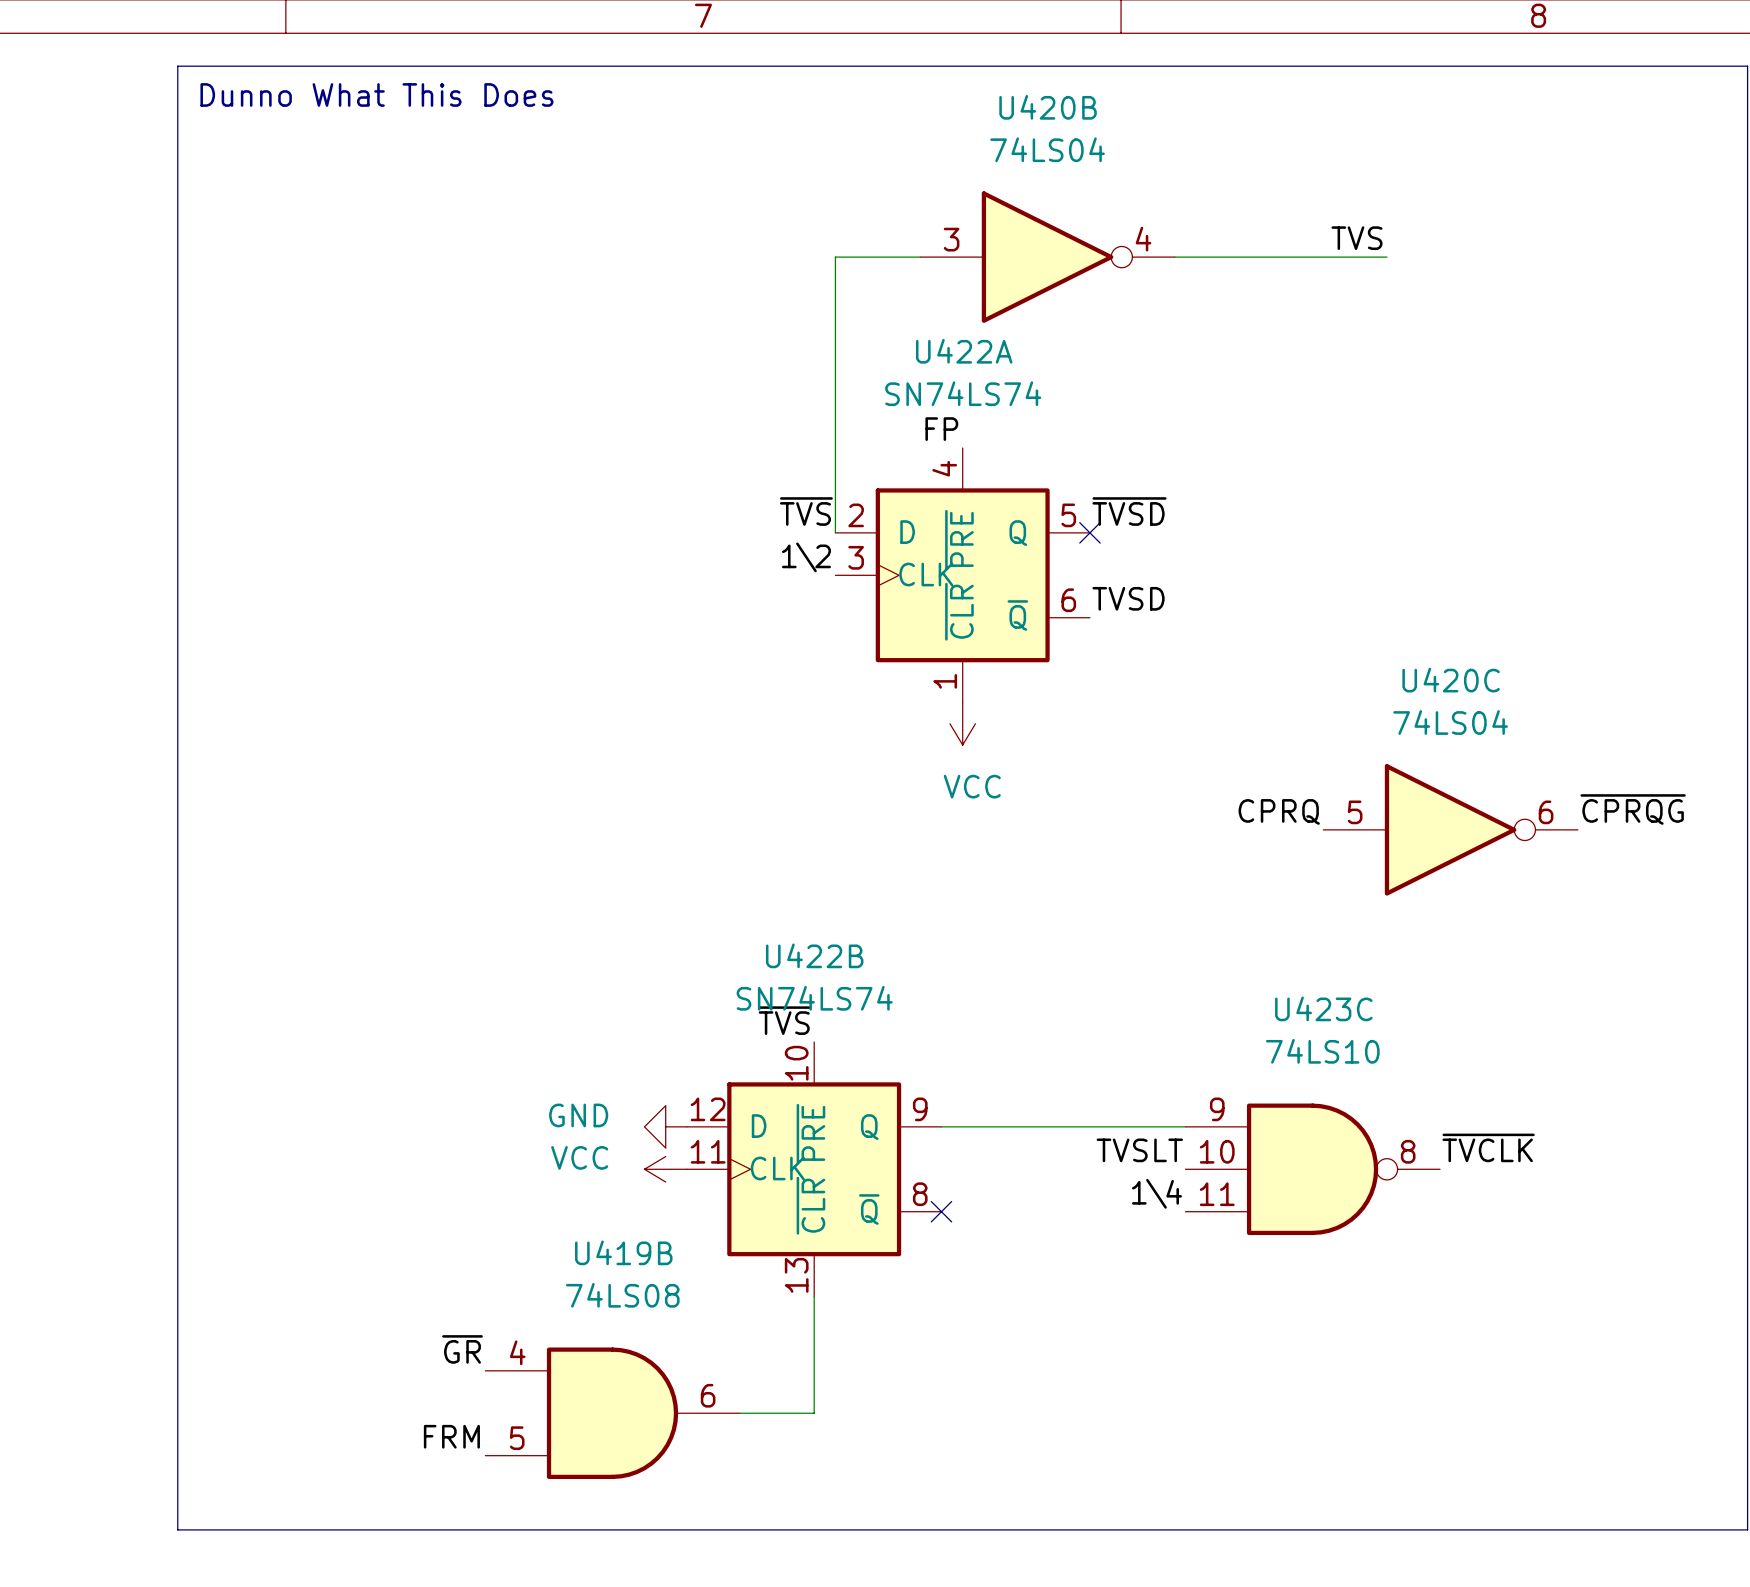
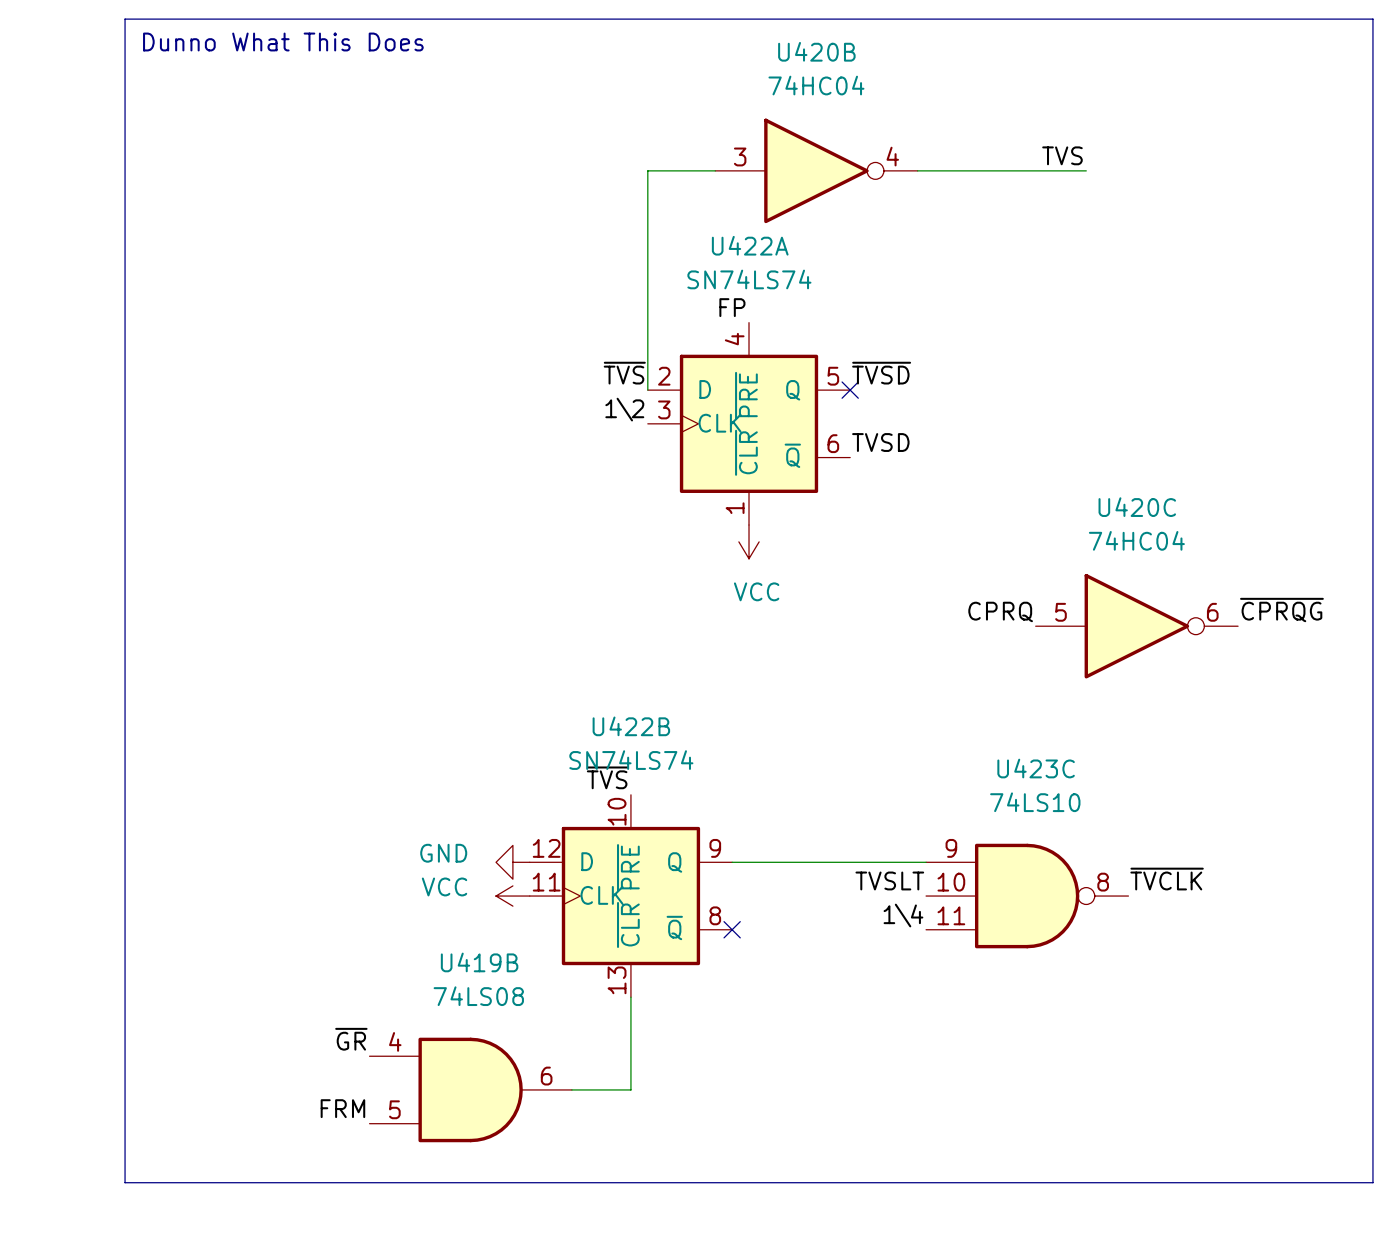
U420B value: 74LS04 (1047, 149) -> 74HC04 (816, 85)
U420C value: 74LS04 (1450, 722) -> 74HC04 (1136, 540)

